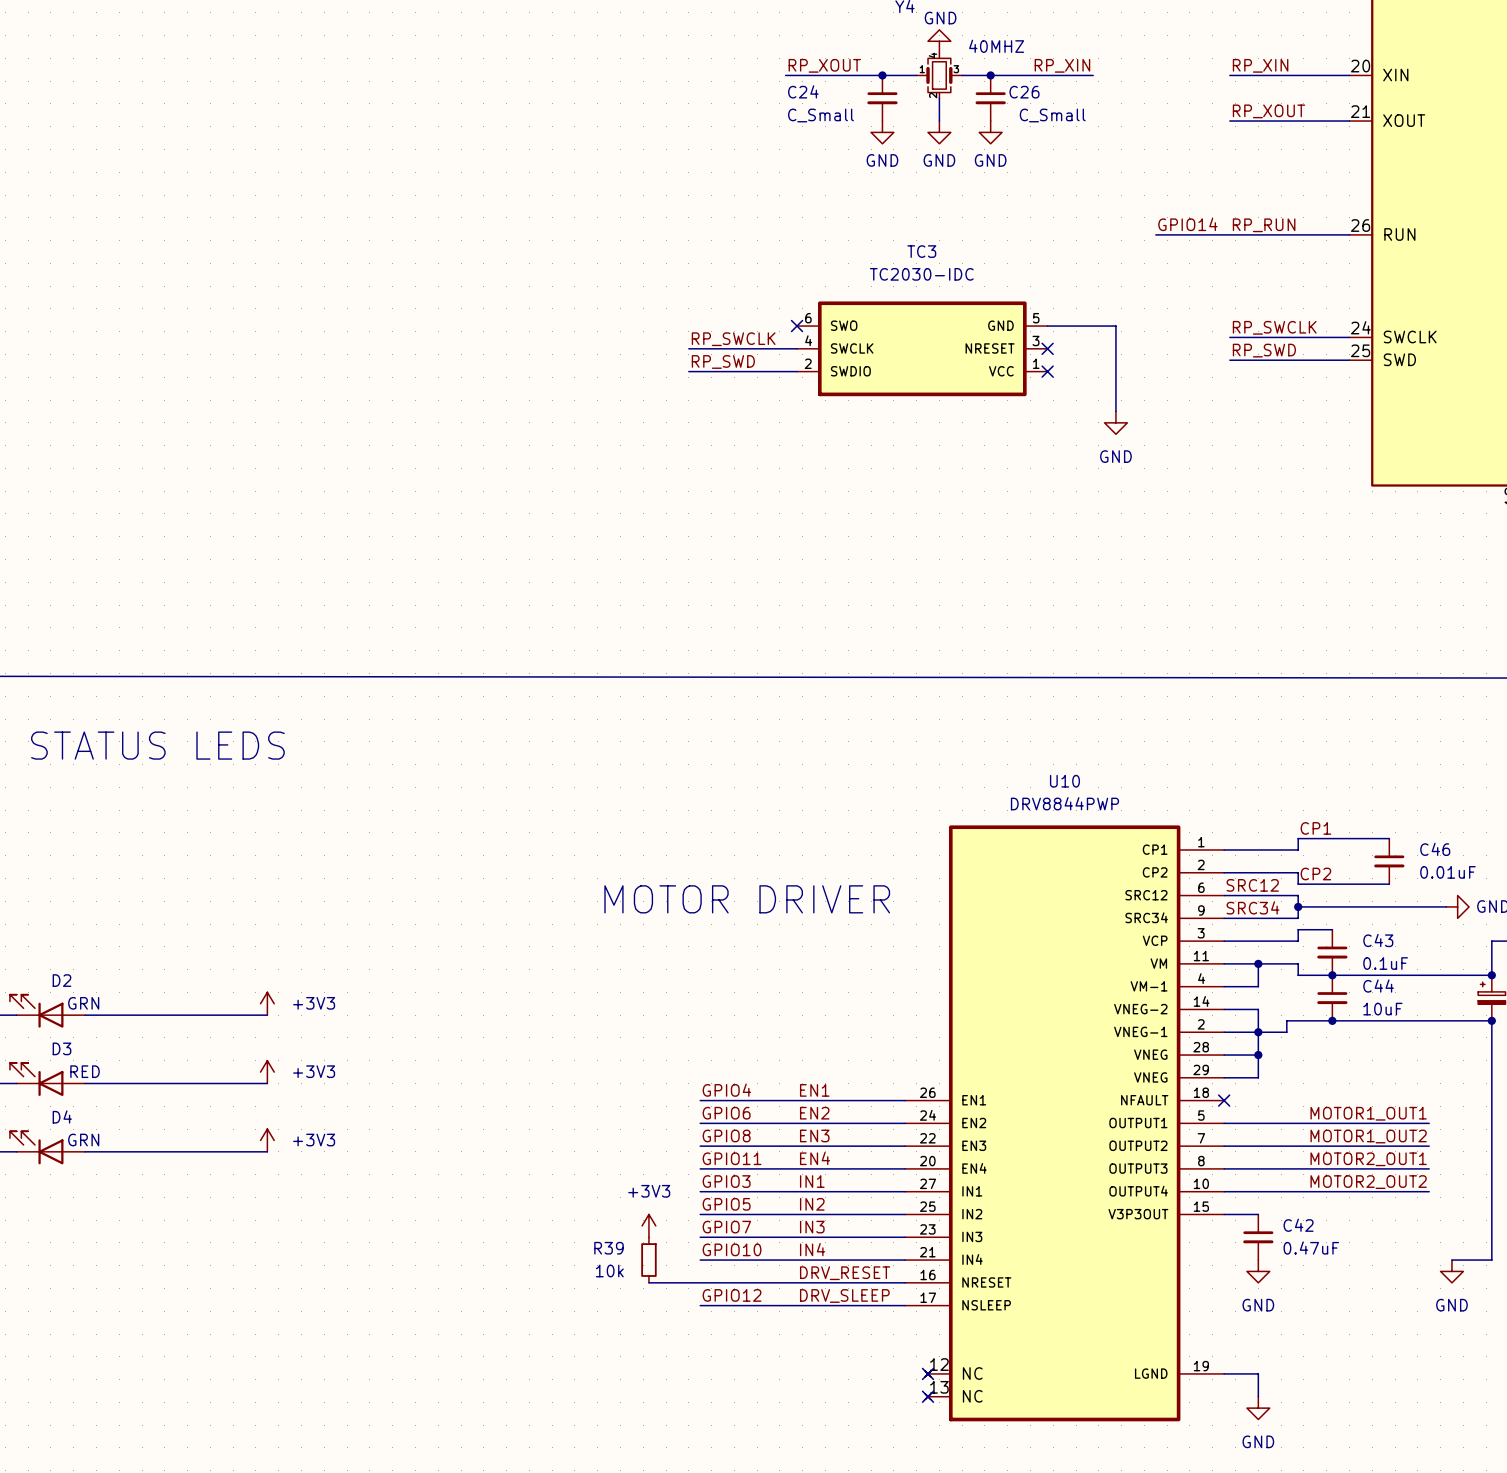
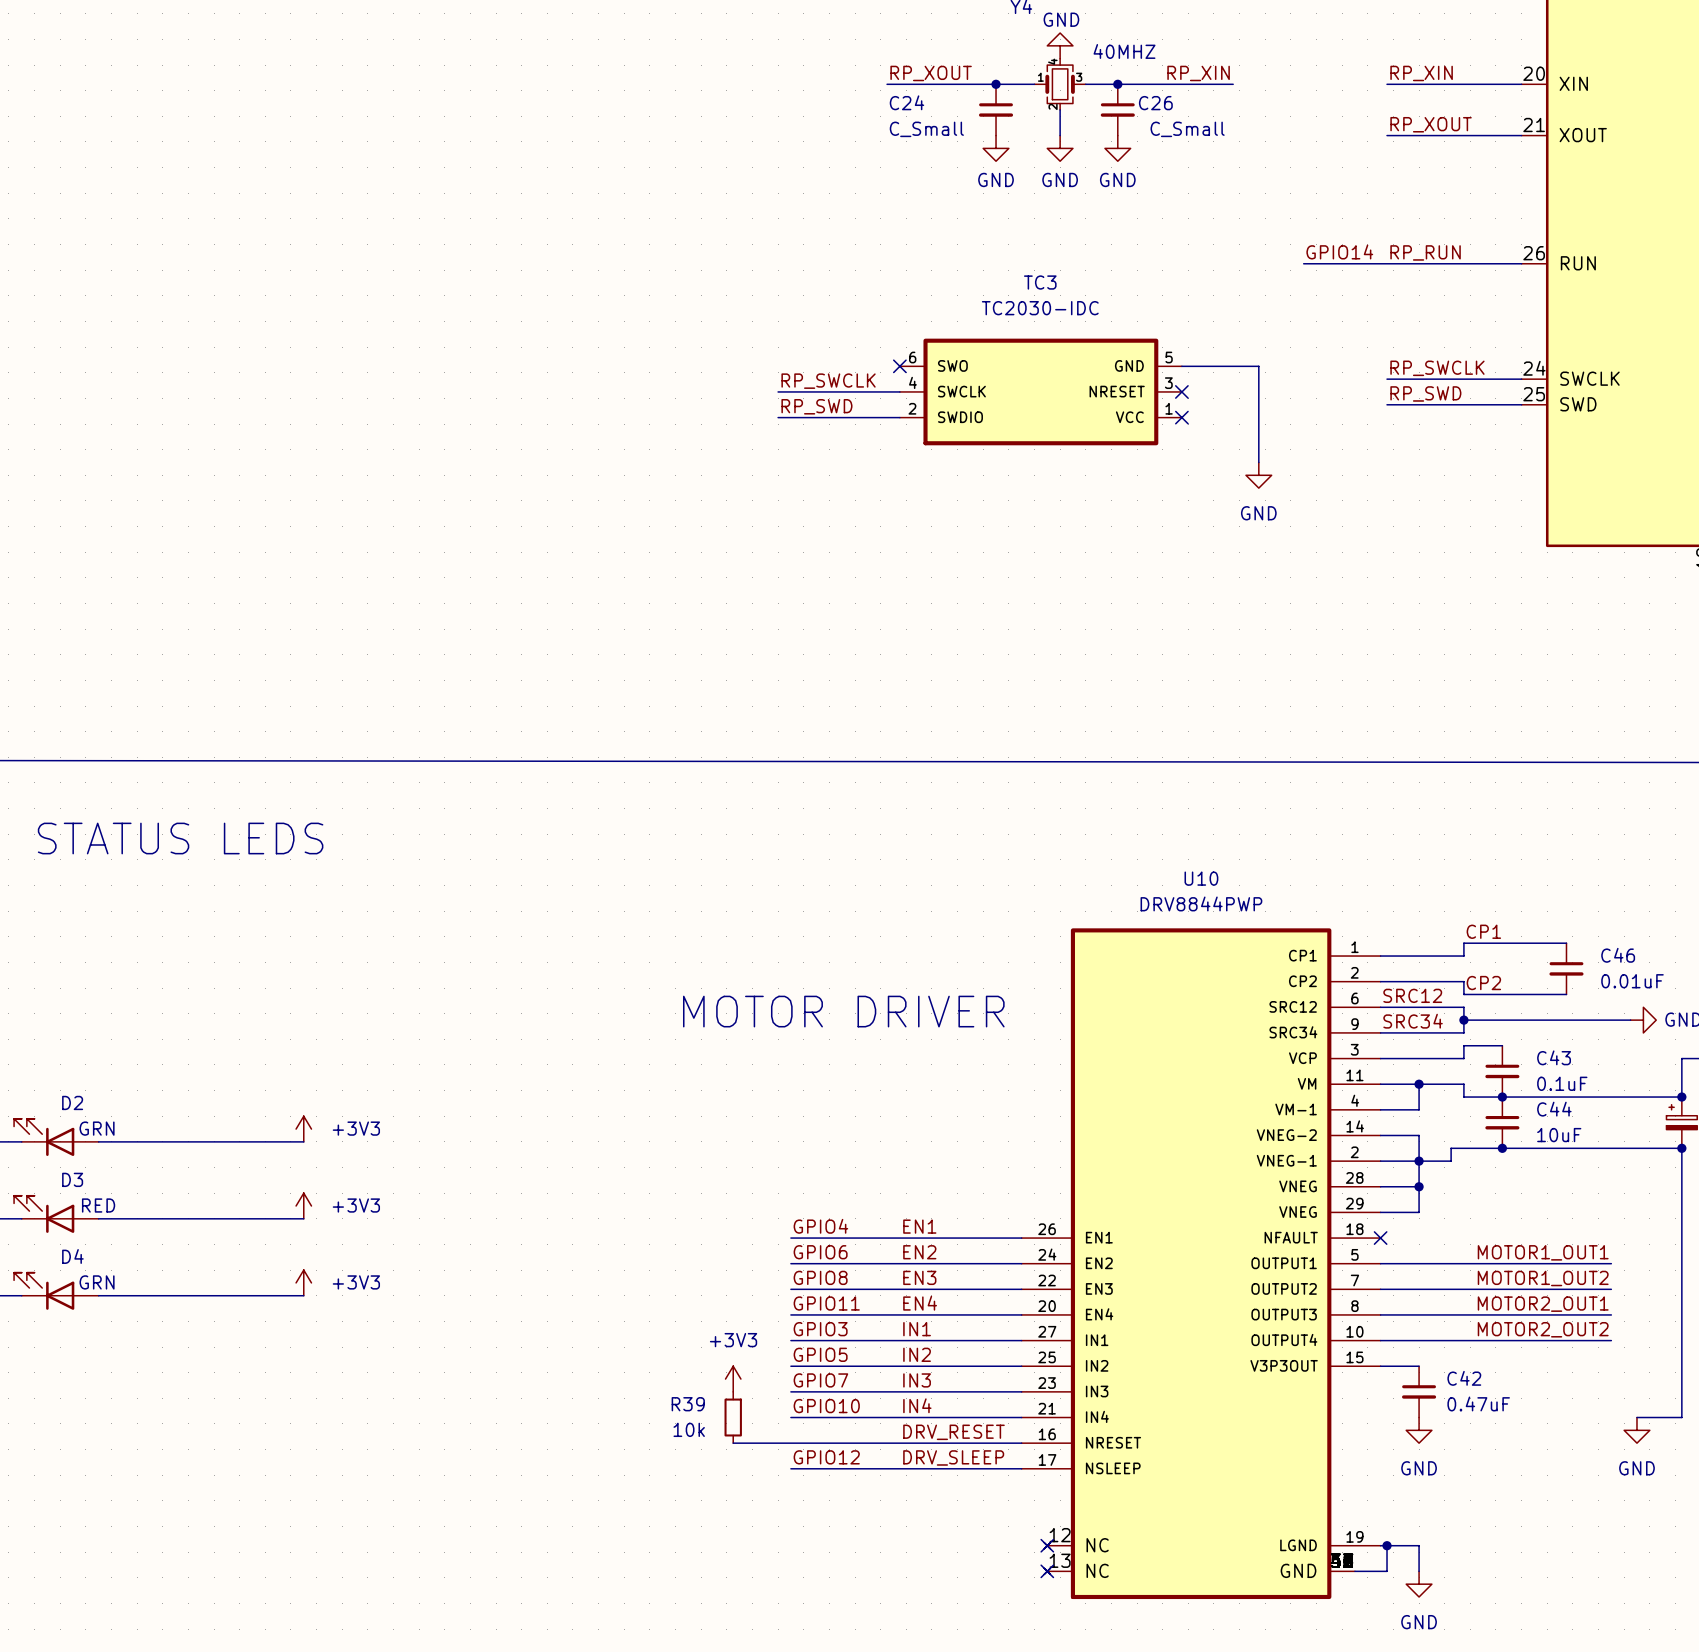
U10 symbol: [905, 825, 1225, 1422] -> [1021, 928, 1381, 1600]
wire: none -> (1387, 1545) (1387, 1571) (1354, 1571)
junction: none -> (1387, 1545)

